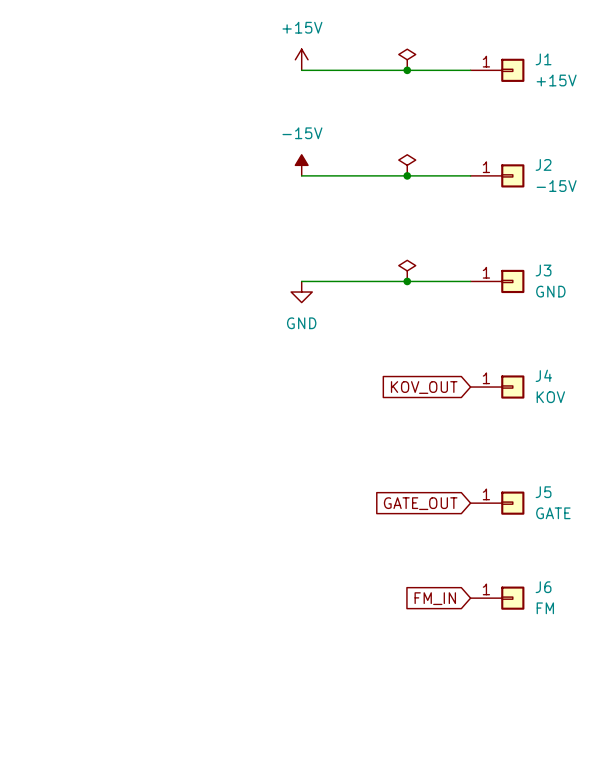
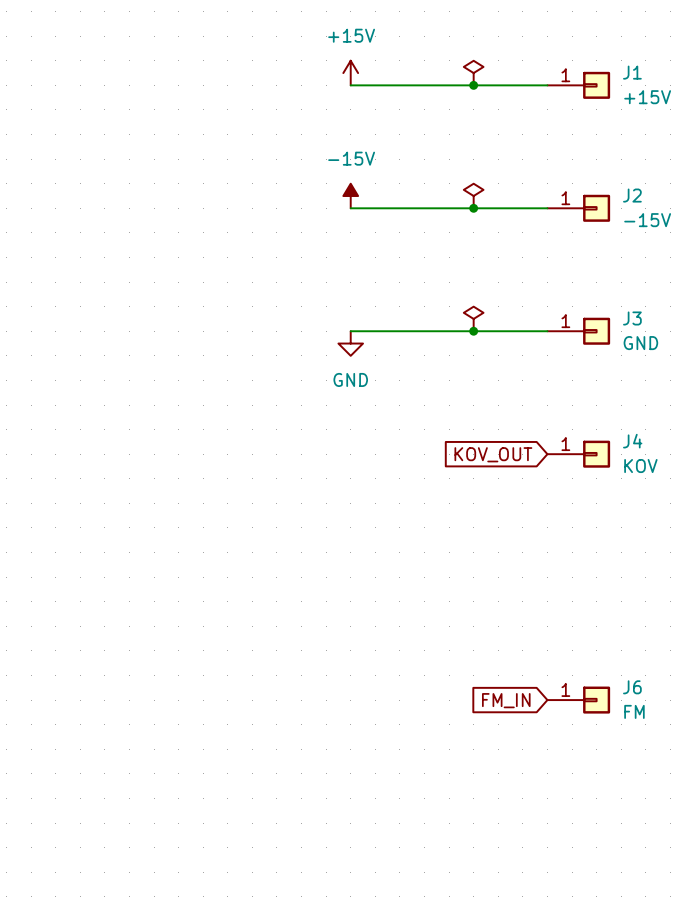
global label: GATE_OUT (420, 503) -> none
J5: GATE (497, 503) -> none

